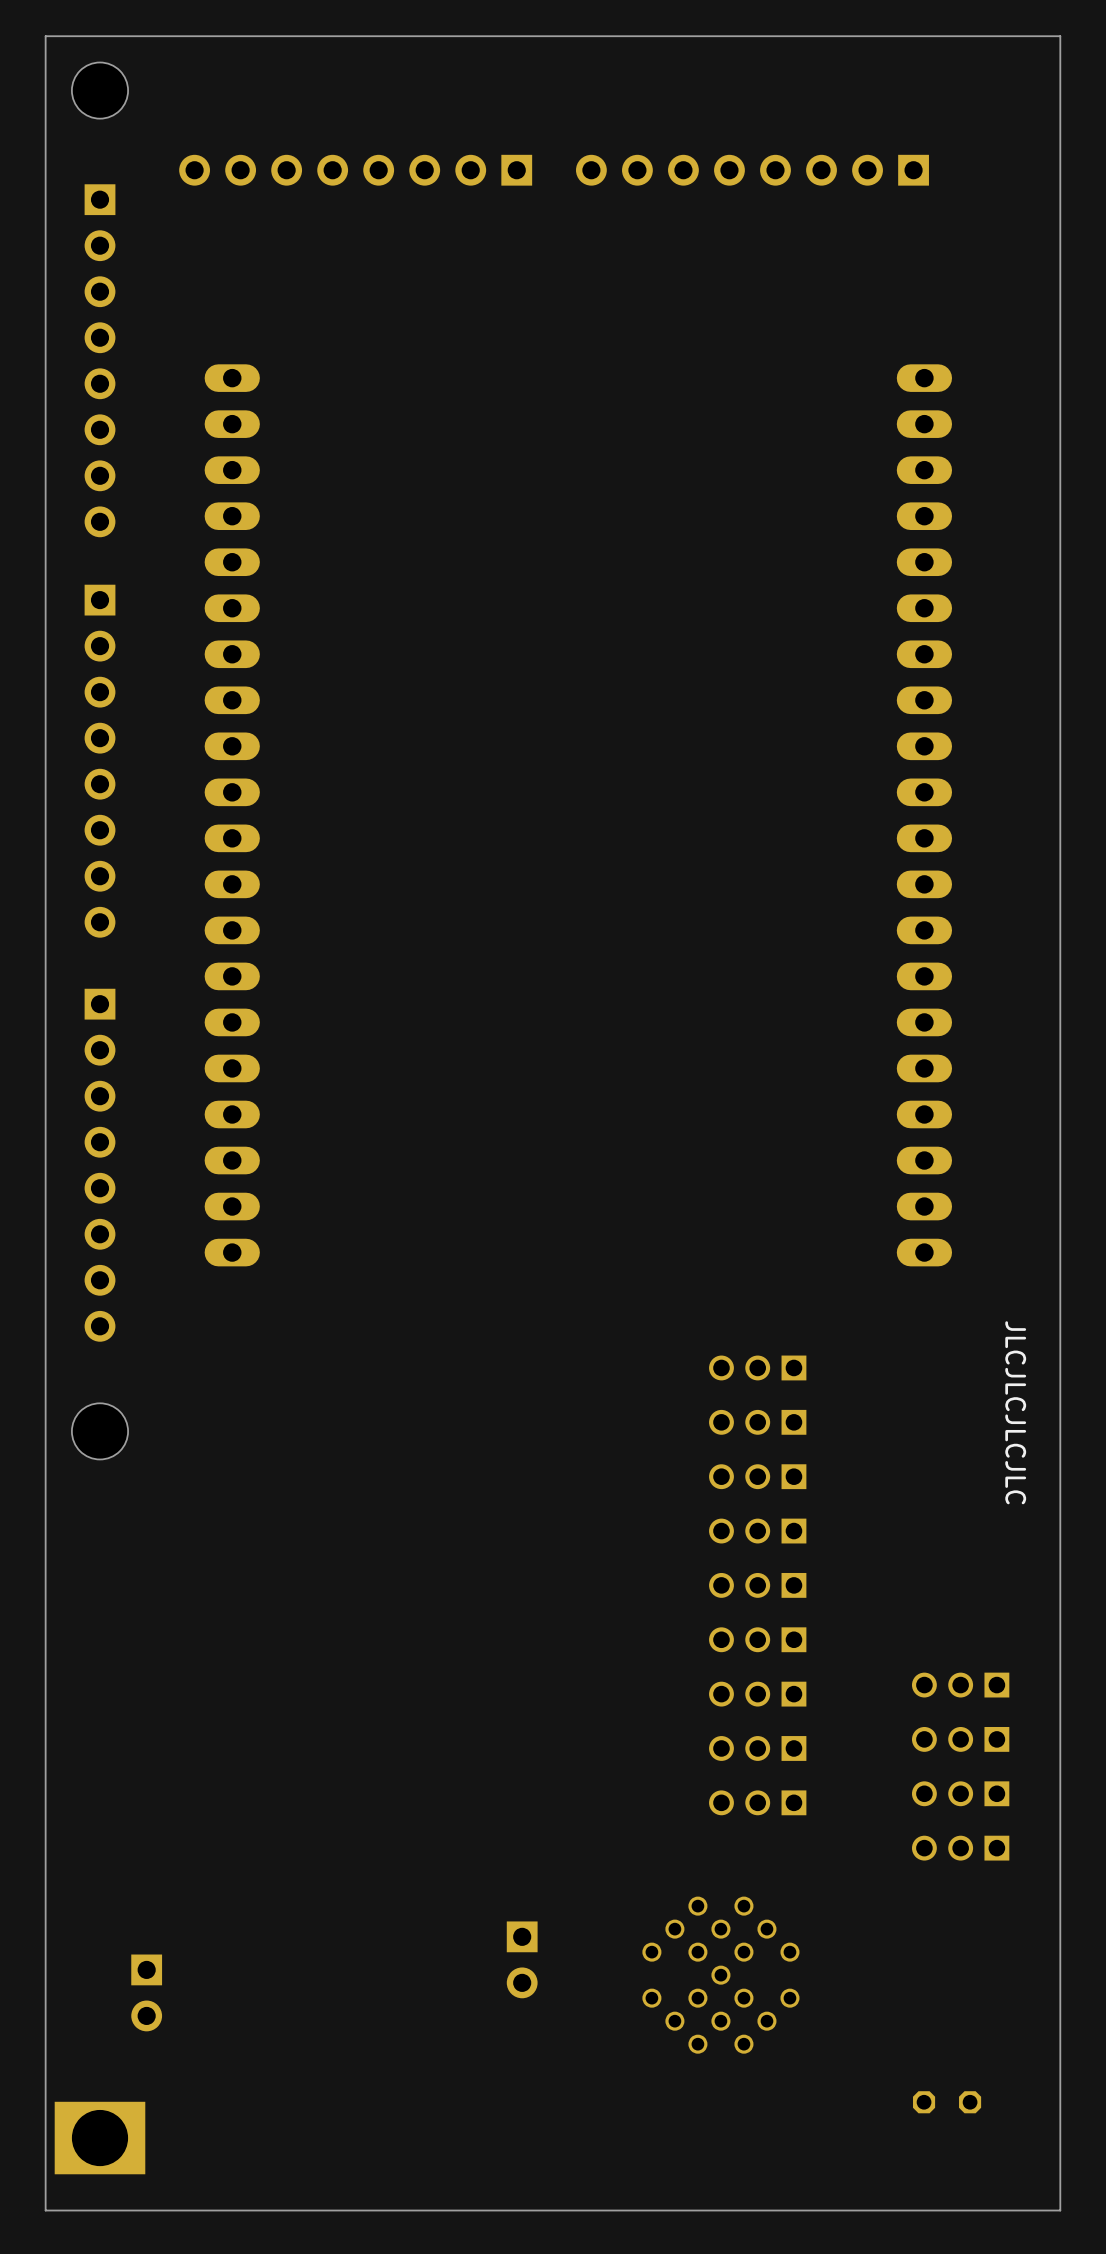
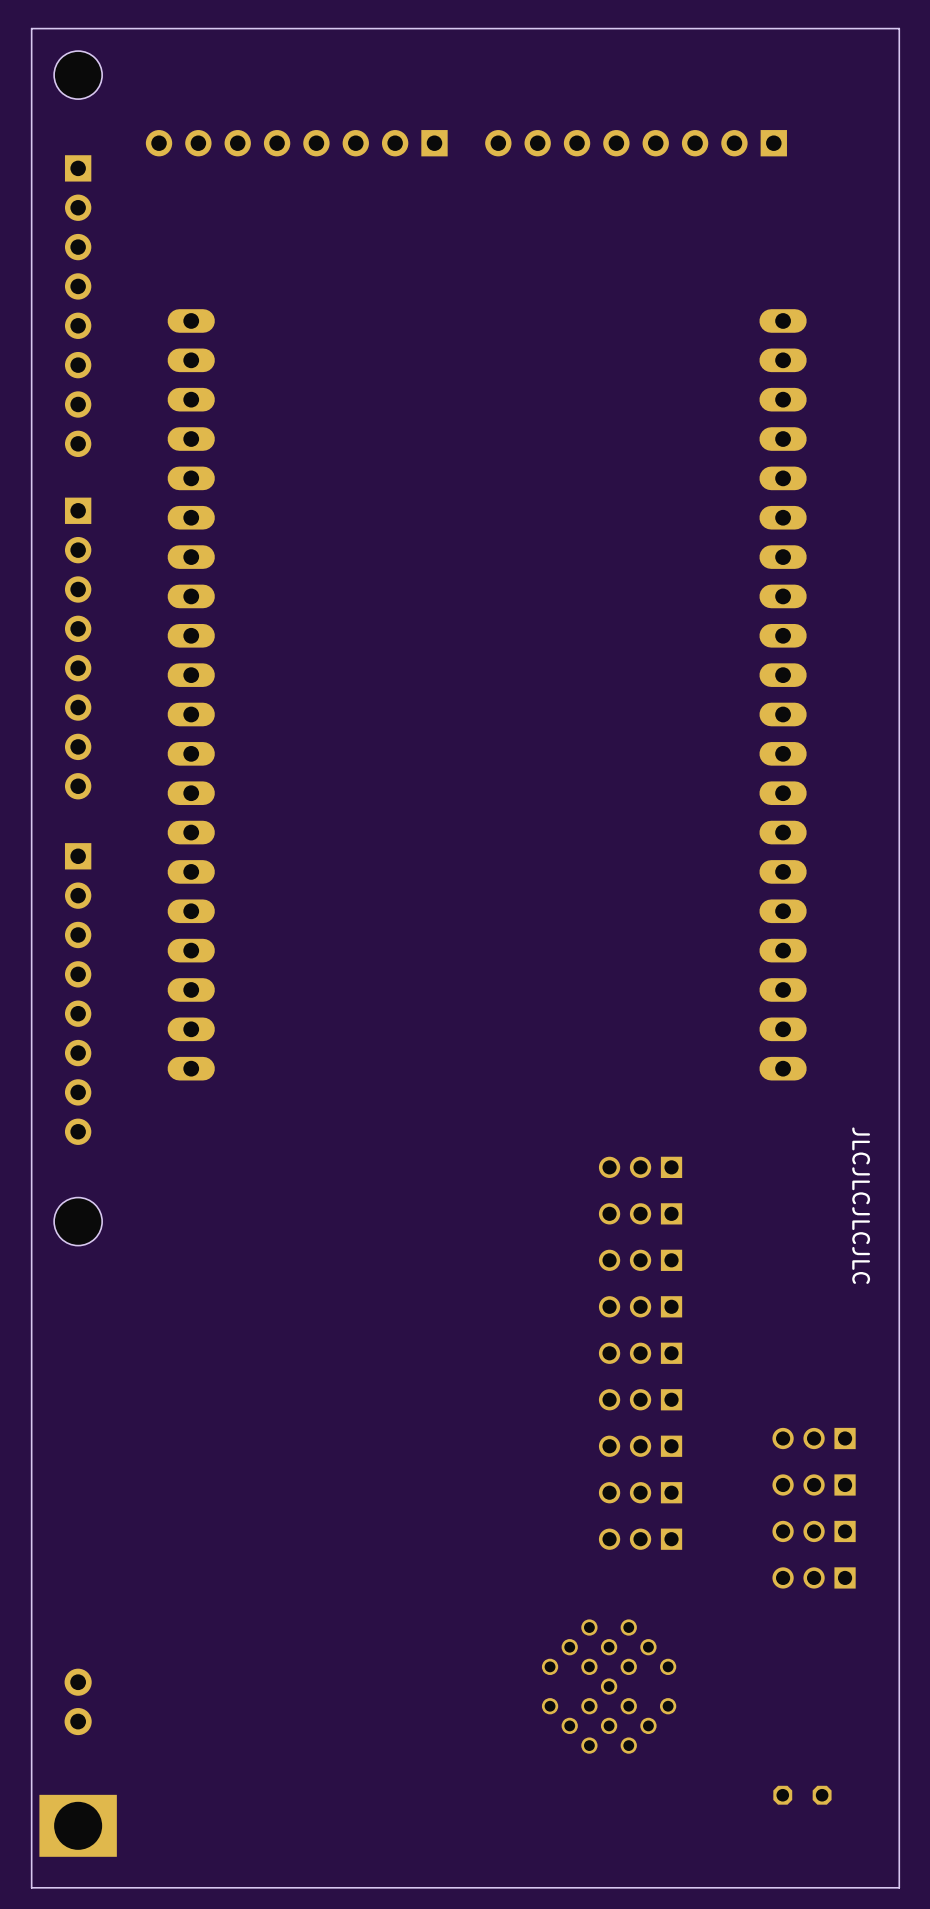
part: (522, 1959) -> none
part: (146, 1992) -> none
part: none -> (78, 1701)

